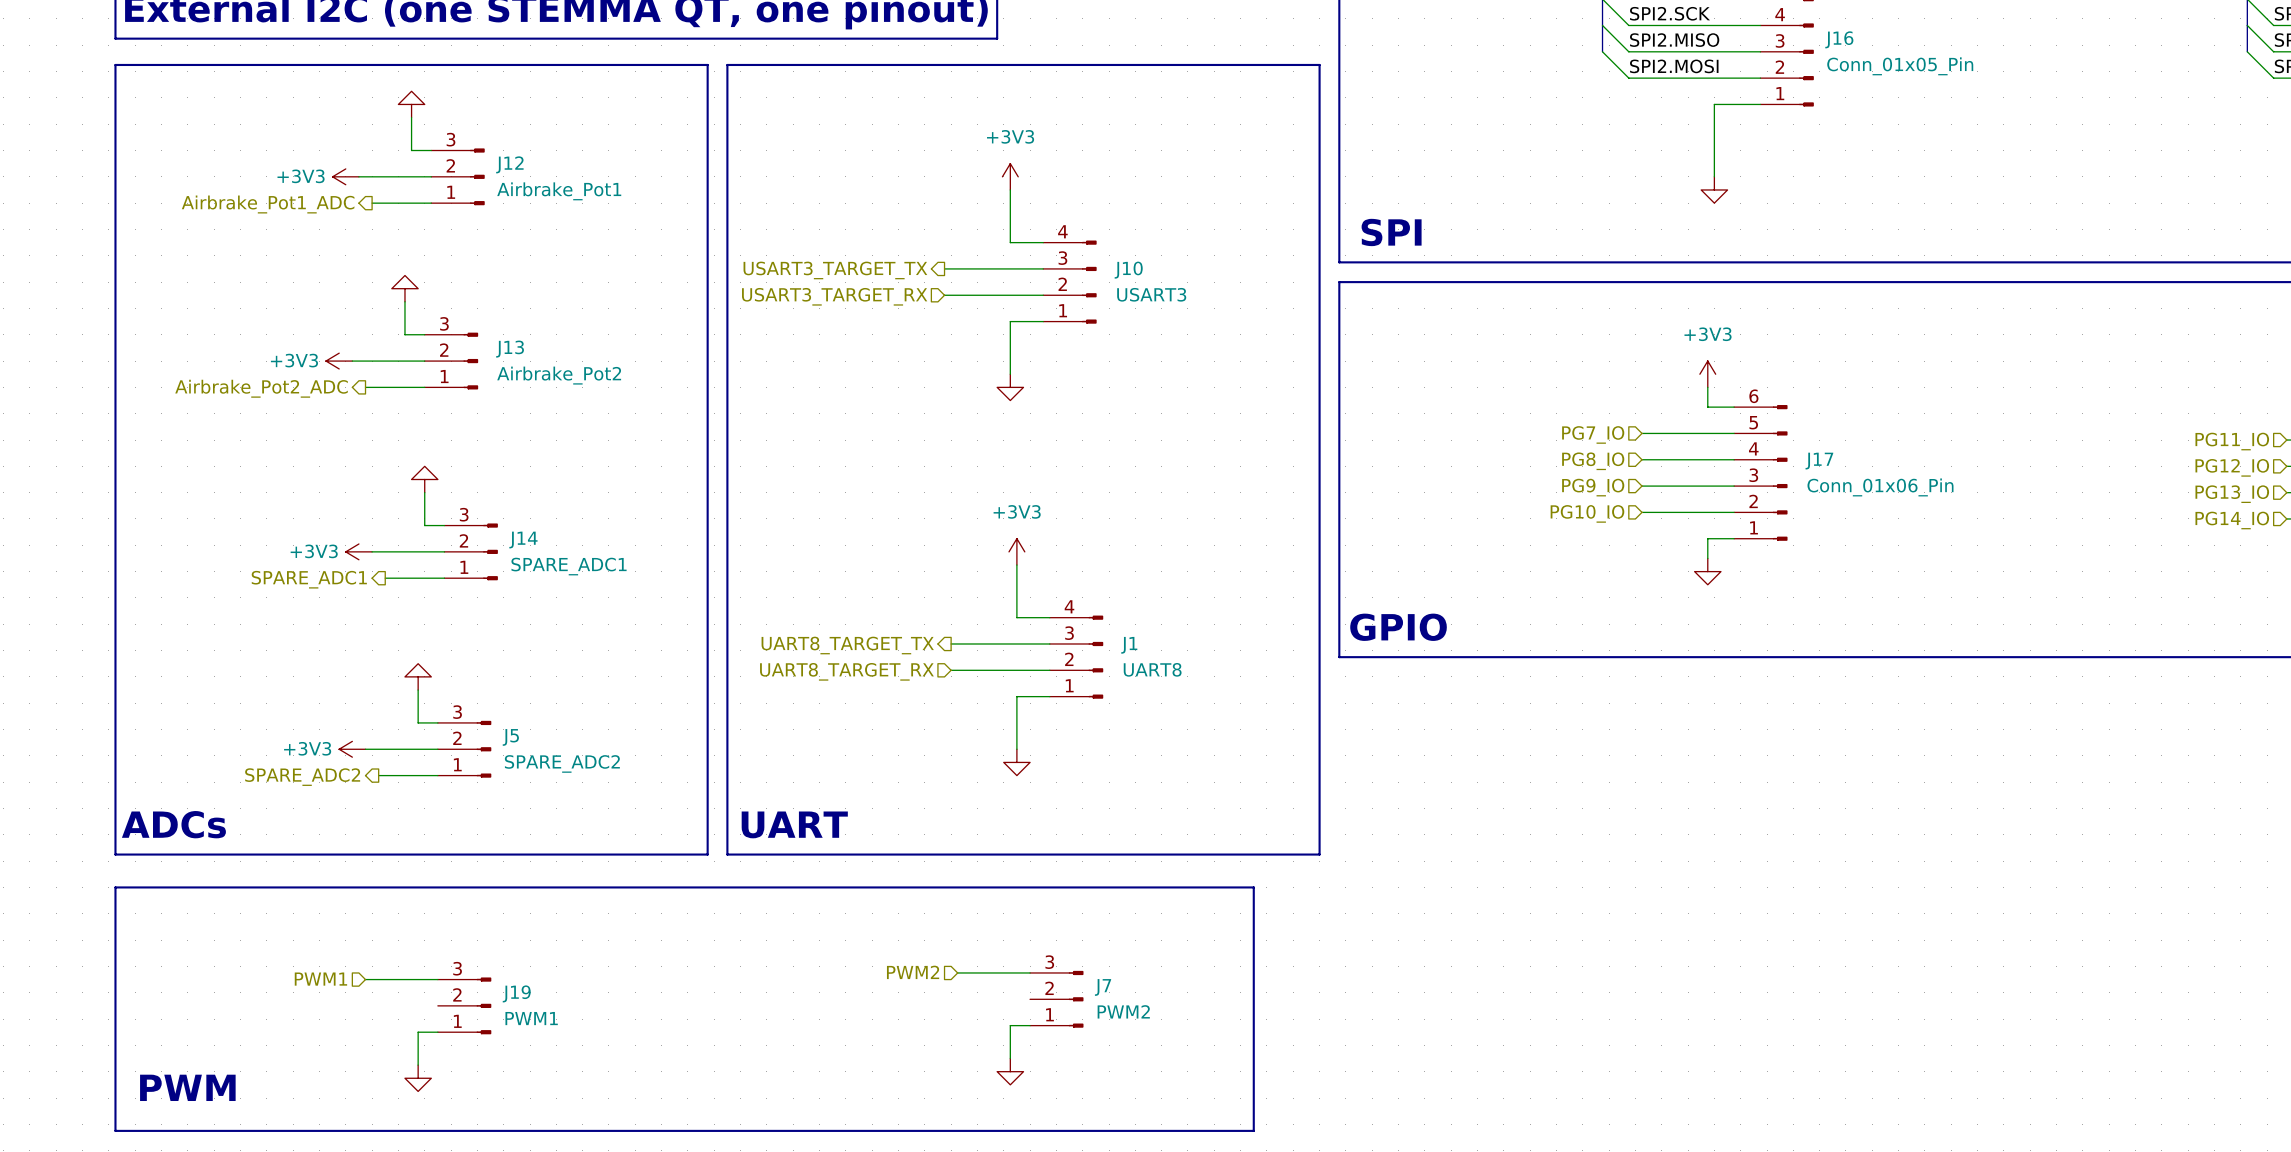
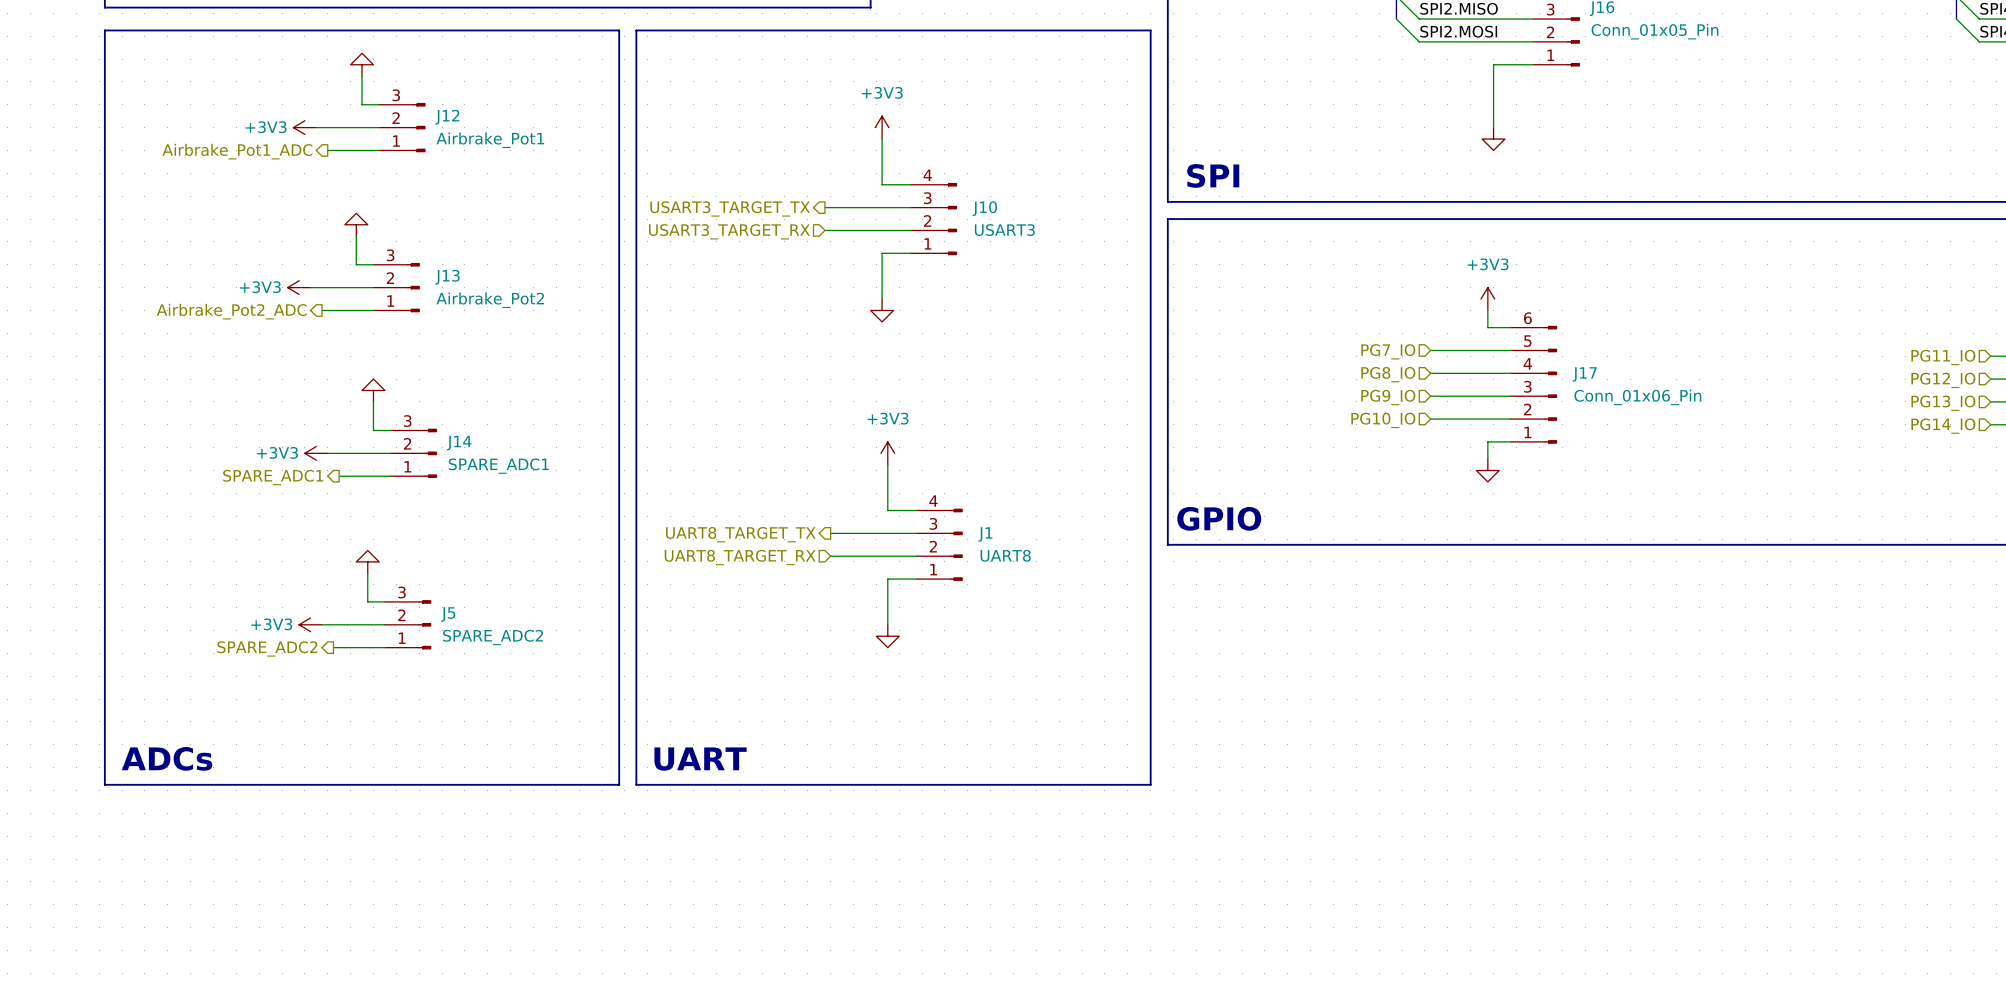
text position: ADCs (173, 824) -> ADCs (167, 758)
text position: UART (794, 824) -> UART (700, 759)
line: (115, 854) (707, 854) -> (104, 784) (619, 784) (619, 716)
line: (727, 854) (1319, 854) -> (636, 716) (636, 784) (1150, 784) (1150, 716)
line: (115, 887) (1253, 887) (1253, 1130) (115, 1130) (115, 933) -> (104, 744) (104, 716)
hierarchical label: PWM2 (913, 972) -> none
wire: (957, 972) (1030, 972) -> none
hierarchical label: PWM1 (320, 979) -> none
wire: (365, 979) (437, 979) -> none
J7: PWM2 (1056, 999) -> none
J19: PWM1 (464, 1005) -> none
wire: (1030, 1025) (1010, 1025) (1010, 1058) -> none
wire: (437, 1032) (418, 1032) (418, 1065) -> none
power symbol: (1010, 1071) -> none
power symbol: (418, 1078) -> none
text: PWM (187, 1087) -> none

